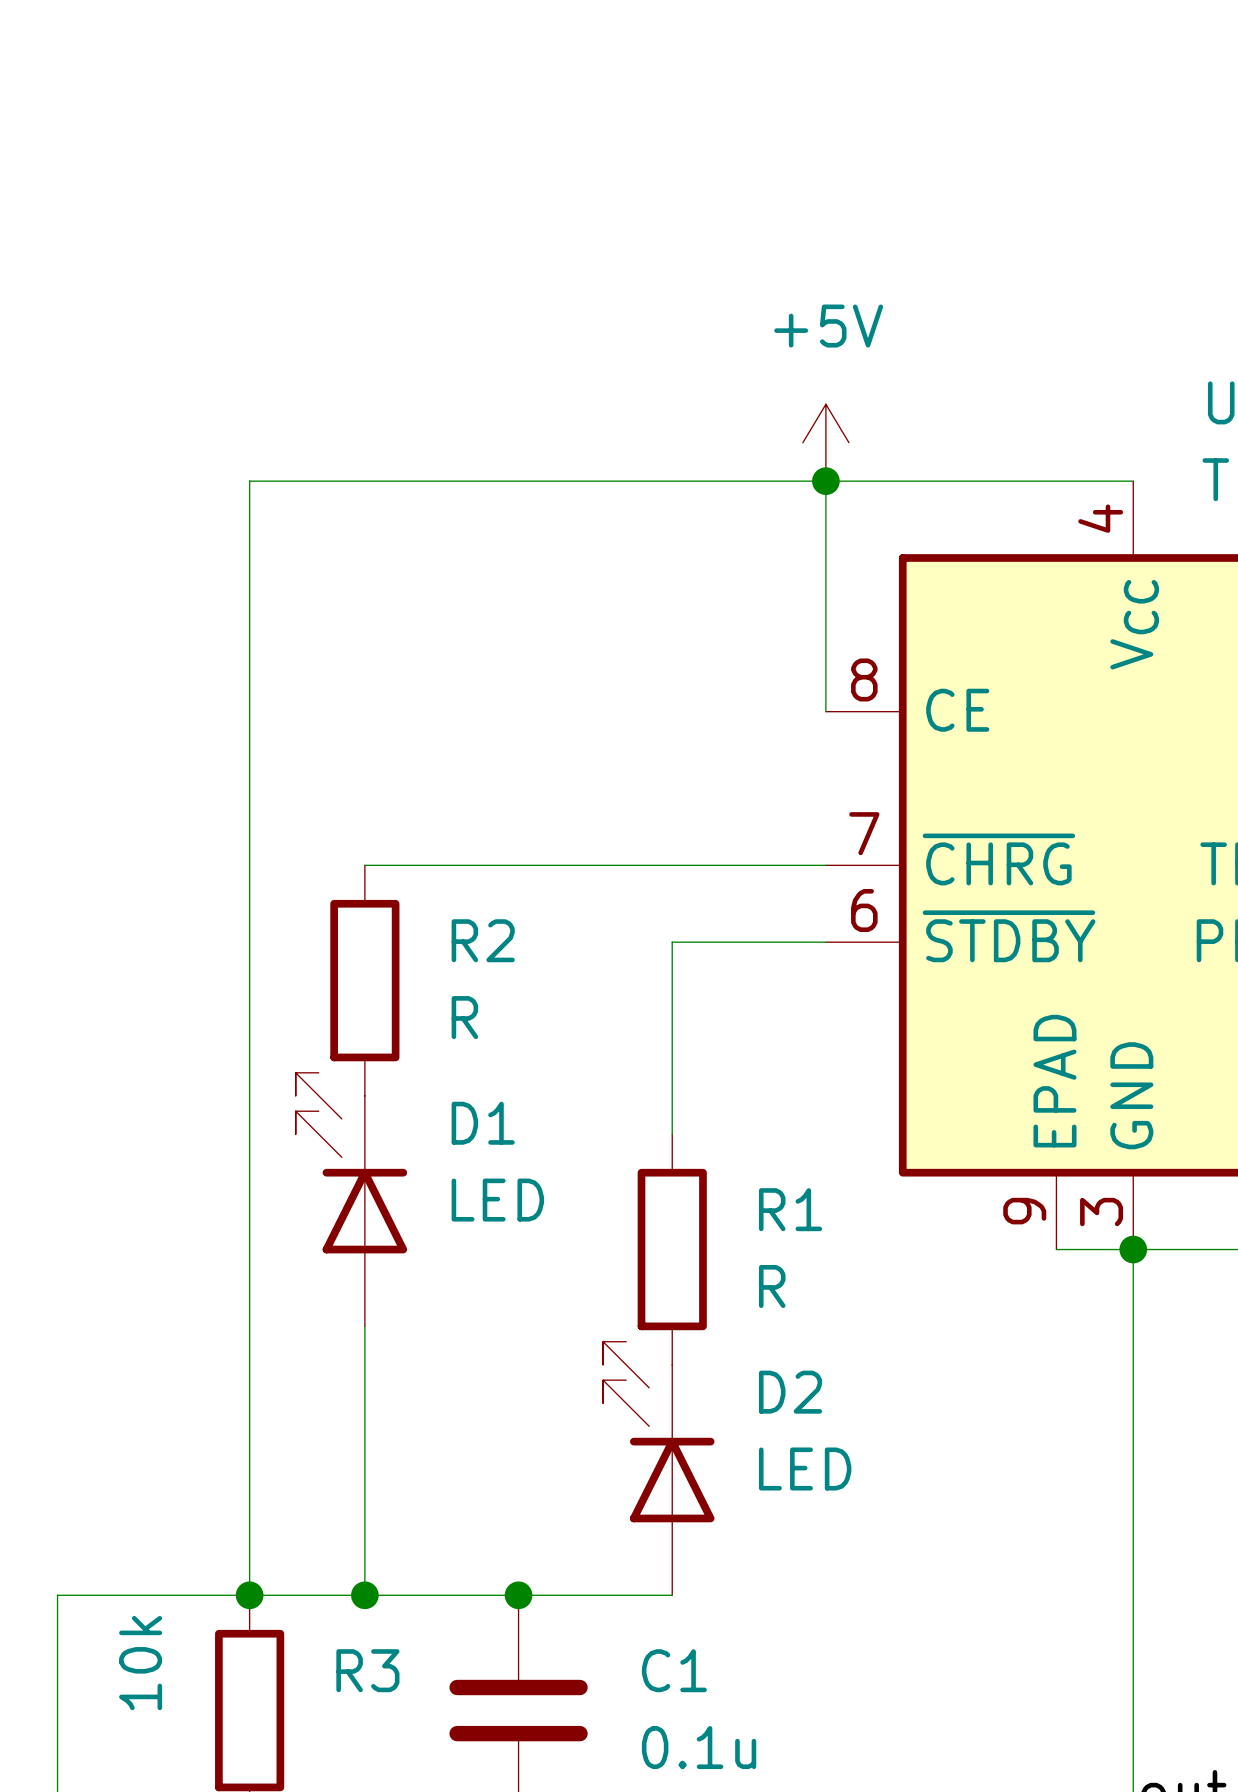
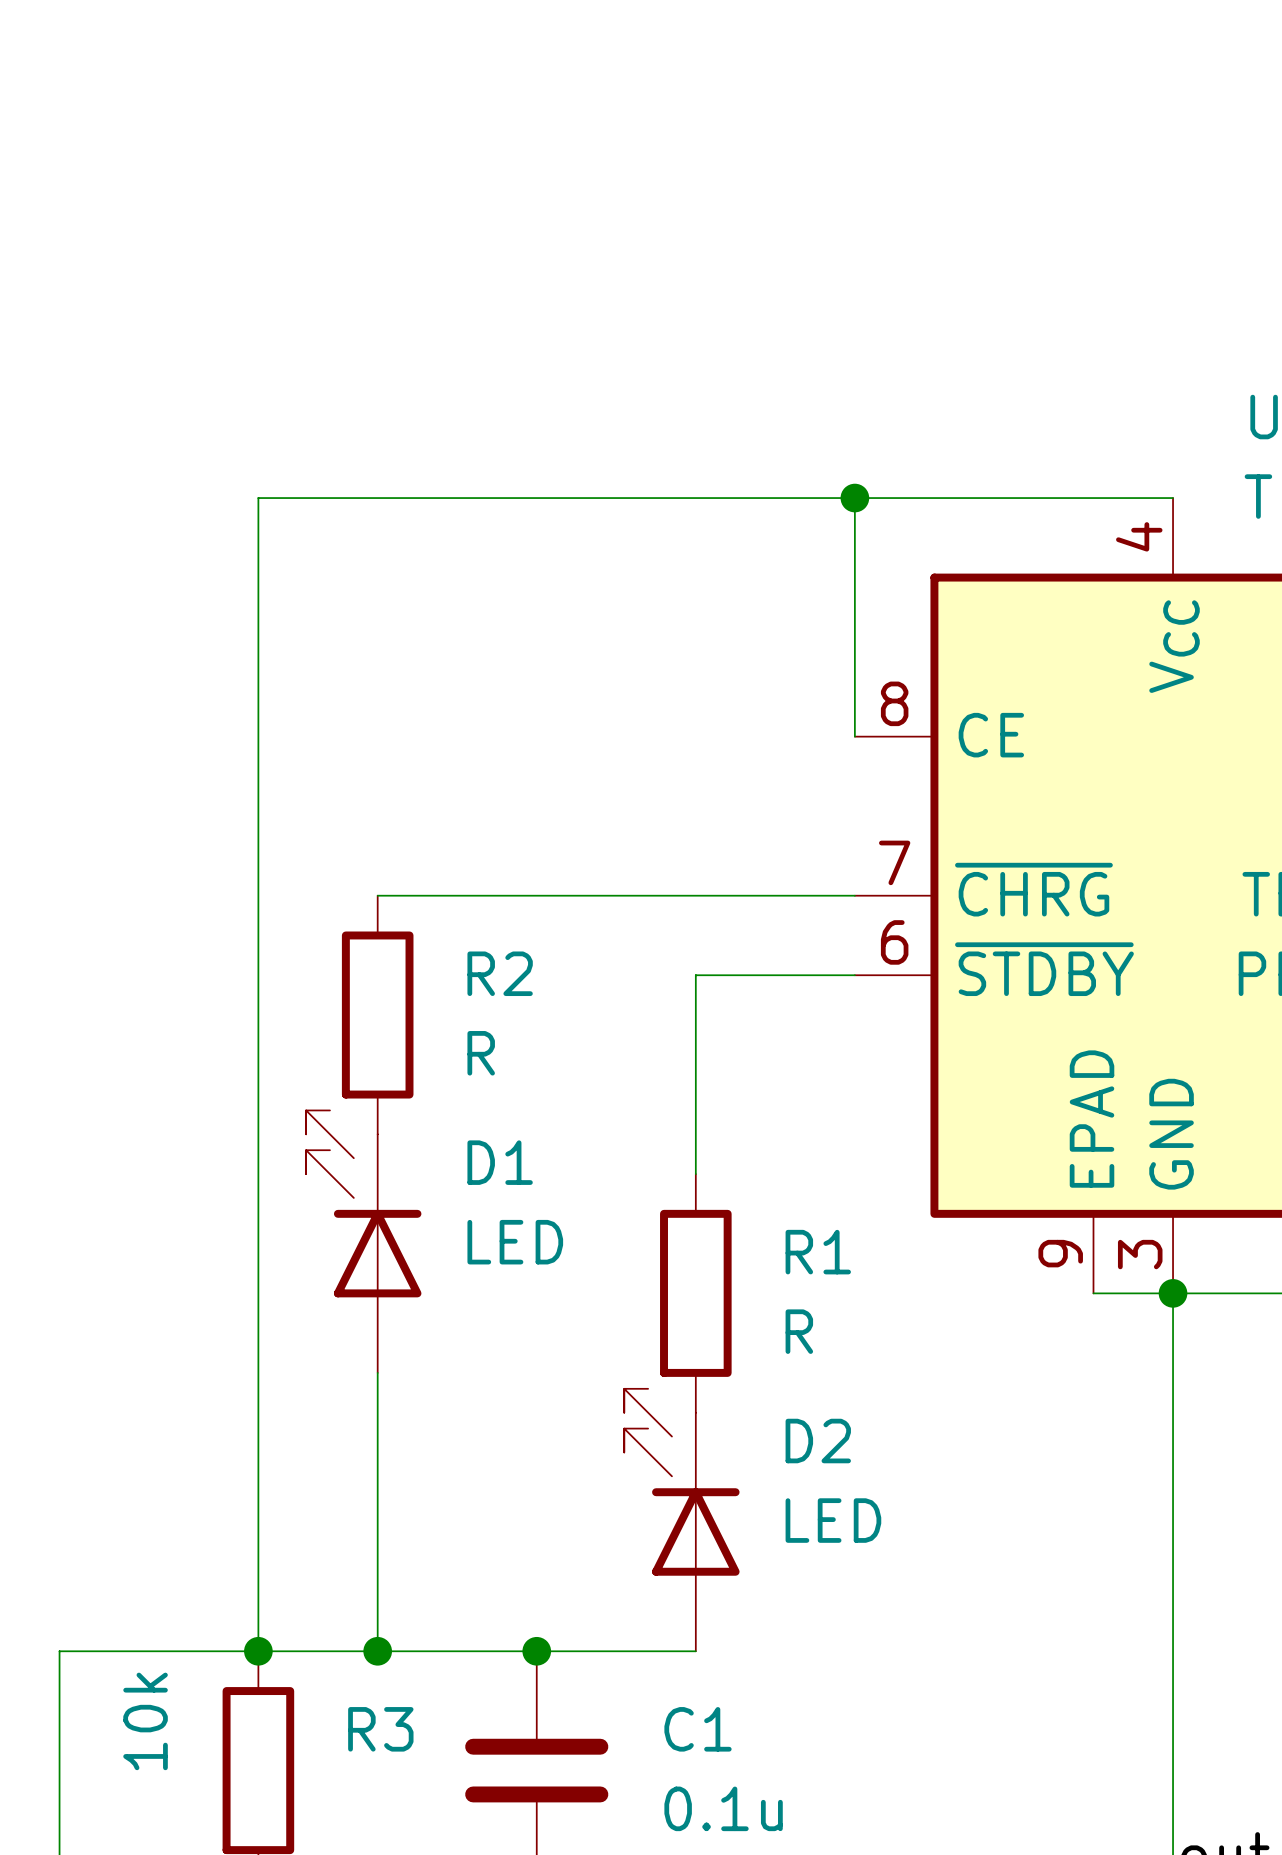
power symbol: +5V (825, 442) -> none

